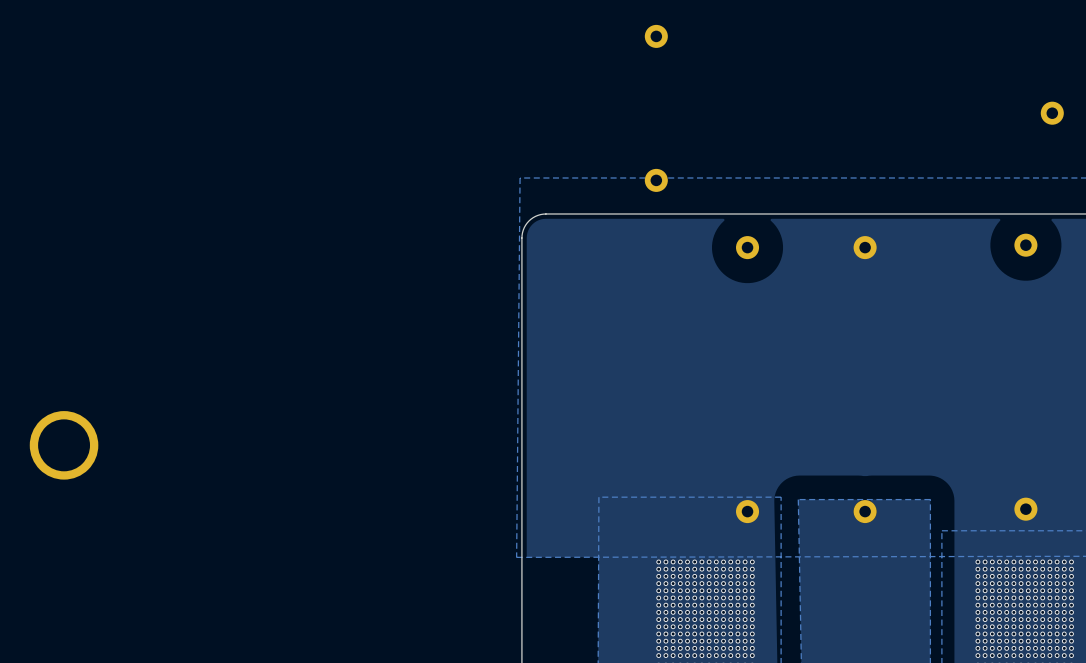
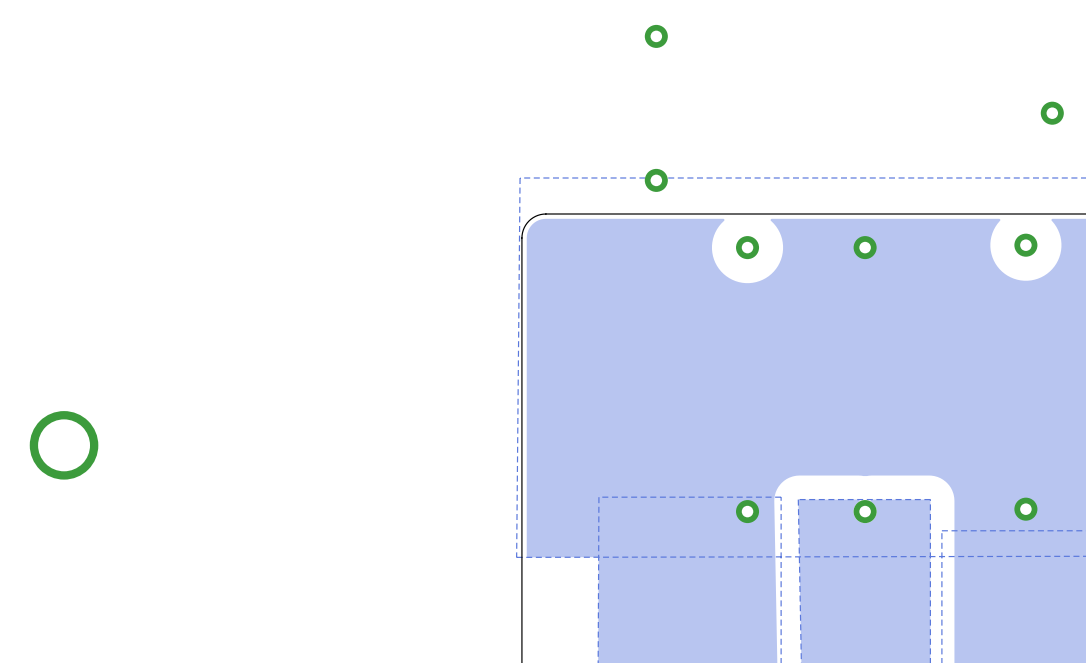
via: (658, 561) -> none
via: (665, 561) -> none
via: (673, 561) -> none
via: (680, 561) -> none
via: (687, 561) -> none
via: (694, 561) -> none
via: (701, 561) -> none
via: (709, 561) -> none
via: (716, 561) -> none
via: (723, 561) -> none
via: (730, 561) -> none
via: (737, 561) -> none
via: (745, 561) -> none
via: (752, 561) -> none
via: (977, 561) -> none
via: (985, 561) -> none
via: (992, 561) -> none
via: (999, 561) -> none
via: (1006, 561) -> none
via: (1013, 561) -> none
via: (1021, 561) -> none
via: (1028, 561) -> none
via: (1035, 561) -> none
via: (1042, 561) -> none
via: (1049, 561) -> none
via: (1057, 561) -> none
via: (1064, 561) -> none
via: (1071, 561) -> none
via: (658, 569) -> none
via: (665, 569) -> none
via: (673, 569) -> none
via: (680, 569) -> none
via: (687, 569) -> none
via: (694, 569) -> none
via: (701, 569) -> none
via: (709, 569) -> none
via: (716, 569) -> none
via: (723, 569) -> none
via: (730, 569) -> none
via: (737, 569) -> none
via: (745, 569) -> none
via: (752, 569) -> none
via: (977, 569) -> none
via: (985, 569) -> none
via: (992, 569) -> none
via: (999, 569) -> none
via: (1006, 569) -> none
via: (1013, 569) -> none
via: (1021, 569) -> none
via: (1028, 569) -> none
via: (1035, 569) -> none
via: (1042, 569) -> none
via: (1049, 569) -> none
via: (1057, 569) -> none
via: (1064, 569) -> none
via: (1071, 569) -> none
via: (658, 576) -> none
via: (665, 576) -> none
via: (673, 576) -> none
via: (680, 576) -> none
via: (687, 576) -> none
via: (694, 576) -> none
via: (701, 576) -> none
via: (709, 576) -> none
via: (716, 576) -> none
via: (723, 576) -> none
via: (730, 576) -> none
via: (737, 576) -> none
via: (745, 576) -> none
via: (752, 576) -> none
via: (977, 576) -> none
via: (985, 576) -> none
via: (992, 576) -> none
via: (999, 576) -> none
via: (1006, 576) -> none
via: (1013, 576) -> none
via: (1021, 576) -> none
via: (1028, 576) -> none
via: (1035, 576) -> none
via: (1042, 576) -> none
via: (1049, 576) -> none
via: (1057, 576) -> none
via: (1064, 576) -> none
via: (1071, 576) -> none
via: (658, 583) -> none
via: (665, 583) -> none
via: (673, 583) -> none
via: (680, 583) -> none
via: (687, 583) -> none
via: (694, 583) -> none
via: (701, 583) -> none
via: (709, 583) -> none
via: (716, 583) -> none
via: (723, 583) -> none
via: (730, 583) -> none
via: (737, 583) -> none
via: (745, 583) -> none
via: (752, 583) -> none
via: (977, 583) -> none
via: (985, 583) -> none
via: (992, 583) -> none
via: (999, 583) -> none
via: (1006, 583) -> none
via: (1013, 583) -> none
via: (1021, 583) -> none
via: (1028, 583) -> none
via: (1035, 583) -> none
via: (1042, 583) -> none
via: (1049, 583) -> none
via: (1057, 583) -> none
via: (1064, 583) -> none
via: (1071, 583) -> none
via: (658, 590) -> none
via: (665, 590) -> none
via: (673, 590) -> none
via: (680, 590) -> none
via: (687, 590) -> none
via: (694, 590) -> none
via: (701, 590) -> none
via: (709, 590) -> none
via: (716, 590) -> none
via: (723, 590) -> none
via: (730, 590) -> none
via: (737, 590) -> none
via: (745, 590) -> none
via: (752, 590) -> none
via: (977, 590) -> none
via: (985, 590) -> none
via: (992, 590) -> none
via: (999, 590) -> none
via: (1006, 590) -> none
via: (1013, 590) -> none
via: (1021, 590) -> none
via: (1028, 590) -> none
via: (1035, 590) -> none
via: (1042, 590) -> none
via: (1049, 590) -> none
via: (1057, 590) -> none
via: (1064, 590) -> none
via: (1071, 590) -> none
via: (658, 597) -> none
via: (665, 597) -> none
via: (673, 597) -> none
via: (680, 597) -> none
via: (687, 597) -> none
via: (694, 597) -> none
via: (701, 597) -> none
via: (709, 597) -> none
via: (716, 597) -> none
via: (723, 597) -> none
via: (730, 597) -> none
via: (737, 597) -> none
via: (745, 597) -> none
via: (752, 597) -> none
via: (977, 597) -> none
via: (985, 597) -> none
via: (992, 597) -> none
via: (999, 597) -> none
via: (1006, 597) -> none
via: (1013, 597) -> none
via: (1021, 597) -> none
via: (1028, 597) -> none
via: (1035, 597) -> none
via: (1042, 597) -> none
via: (1049, 597) -> none
via: (1057, 597) -> none
via: (1064, 597) -> none
via: (1071, 597) -> none
via: (658, 605) -> none
via: (665, 605) -> none
via: (673, 605) -> none
via: (680, 605) -> none
via: (687, 605) -> none
via: (694, 605) -> none
via: (701, 605) -> none
via: (709, 605) -> none
via: (716, 605) -> none
via: (723, 605) -> none
via: (730, 605) -> none
via: (737, 605) -> none
via: (745, 605) -> none
via: (752, 605) -> none
via: (977, 605) -> none
via: (985, 605) -> none
via: (992, 605) -> none
via: (999, 605) -> none
via: (1006, 605) -> none
via: (1013, 605) -> none
via: (1021, 605) -> none
via: (1028, 605) -> none
via: (1035, 605) -> none
via: (1042, 605) -> none
via: (1049, 605) -> none
via: (1057, 605) -> none
via: (1064, 605) -> none
via: (1071, 605) -> none
via: (658, 612) -> none
via: (665, 612) -> none
via: (673, 612) -> none
via: (680, 612) -> none
via: (687, 612) -> none
via: (694, 612) -> none
via: (701, 612) -> none
via: (709, 612) -> none
via: (716, 612) -> none
via: (723, 612) -> none
via: (730, 612) -> none
via: (737, 612) -> none
via: (745, 612) -> none
via: (752, 612) -> none
via: (977, 612) -> none
via: (985, 612) -> none
via: (992, 612) -> none
via: (999, 612) -> none
via: (1006, 612) -> none
via: (1013, 612) -> none
via: (1021, 612) -> none
via: (1028, 612) -> none
via: (1035, 612) -> none
via: (1042, 612) -> none
via: (1049, 612) -> none
via: (1057, 612) -> none
via: (1064, 612) -> none
via: (1071, 612) -> none
via: (658, 619) -> none
via: (665, 619) -> none
via: (673, 619) -> none
via: (680, 619) -> none
via: (687, 619) -> none
via: (694, 619) -> none
via: (701, 619) -> none
via: (709, 619) -> none
via: (716, 619) -> none
via: (723, 619) -> none
via: (730, 619) -> none
via: (737, 619) -> none
via: (745, 619) -> none
via: (752, 619) -> none
via: (977, 619) -> none
via: (985, 619) -> none
via: (992, 619) -> none
via: (999, 619) -> none
via: (1006, 619) -> none
via: (1013, 619) -> none
via: (1021, 619) -> none
via: (1028, 619) -> none
via: (1035, 619) -> none
via: (1042, 619) -> none
via: (1049, 619) -> none
via: (1057, 619) -> none
via: (1064, 619) -> none
via: (1071, 619) -> none
via: (658, 626) -> none
via: (665, 626) -> none
via: (673, 626) -> none
via: (680, 626) -> none
via: (687, 626) -> none
via: (694, 626) -> none
via: (701, 626) -> none
via: (709, 626) -> none
via: (716, 626) -> none
via: (723, 626) -> none
via: (730, 626) -> none
via: (737, 626) -> none
via: (745, 626) -> none
via: (752, 626) -> none
via: (977, 626) -> none
via: (985, 626) -> none
via: (992, 626) -> none
via: (999, 626) -> none
via: (1006, 626) -> none
via: (1013, 626) -> none
via: (1021, 626) -> none
via: (1028, 626) -> none
via: (1035, 626) -> none
via: (1042, 626) -> none
via: (1049, 626) -> none
via: (1057, 626) -> none
via: (1064, 626) -> none
via: (1071, 626) -> none
via: (658, 633) -> none
via: (665, 633) -> none
via: (673, 633) -> none
via: (680, 633) -> none
via: (687, 633) -> none
via: (694, 633) -> none
via: (701, 633) -> none
via: (709, 633) -> none
via: (716, 633) -> none
via: (723, 633) -> none
via: (730, 633) -> none
via: (737, 633) -> none
via: (745, 633) -> none
via: (752, 633) -> none
via: (977, 633) -> none
via: (985, 633) -> none
via: (992, 633) -> none
via: (999, 633) -> none
via: (1006, 633) -> none
via: (1013, 633) -> none
via: (1021, 633) -> none
via: (1028, 633) -> none
via: (1035, 633) -> none
via: (1042, 633) -> none
via: (1049, 633) -> none
via: (1057, 633) -> none
via: (1064, 633) -> none
via: (1071, 633) -> none
via: (658, 641) -> none
via: (665, 641) -> none
via: (673, 641) -> none
via: (680, 641) -> none
via: (687, 641) -> none
via: (694, 641) -> none
via: (701, 641) -> none
via: (709, 641) -> none
via: (716, 641) -> none
via: (723, 641) -> none
via: (730, 641) -> none
via: (737, 641) -> none
via: (745, 641) -> none
via: (752, 641) -> none
via: (977, 641) -> none
via: (985, 641) -> none
via: (992, 641) -> none
via: (999, 641) -> none
via: (1006, 641) -> none
via: (1013, 641) -> none
via: (1021, 641) -> none
via: (1028, 641) -> none
via: (1035, 641) -> none
via: (1042, 641) -> none
via: (1049, 641) -> none
via: (1057, 641) -> none
via: (1064, 641) -> none
via: (1071, 641) -> none
via: (658, 648) -> none
via: (665, 648) -> none
via: (673, 648) -> none
via: (680, 648) -> none
via: (687, 648) -> none
via: (694, 648) -> none
via: (701, 648) -> none
via: (709, 648) -> none
via: (716, 648) -> none
via: (723, 648) -> none
via: (730, 648) -> none
via: (737, 648) -> none
via: (745, 648) -> none
via: (752, 648) -> none
via: (977, 648) -> none
via: (985, 648) -> none
via: (992, 648) -> none
via: (999, 648) -> none
via: (1006, 648) -> none
via: (1013, 648) -> none
via: (1021, 648) -> none
via: (1028, 648) -> none
via: (1035, 648) -> none
via: (1042, 648) -> none
via: (1049, 648) -> none
via: (1057, 648) -> none
via: (1064, 648) -> none
via: (1071, 648) -> none
via: (658, 655) -> none
via: (665, 655) -> none
via: (673, 655) -> none
via: (680, 655) -> none
via: (687, 655) -> none
via: (694, 655) -> none
via: (701, 655) -> none
via: (709, 655) -> none
via: (716, 655) -> none
via: (723, 655) -> none
via: (730, 655) -> none
via: (737, 655) -> none
via: (745, 655) -> none
via: (752, 655) -> none
via: (977, 655) -> none
via: (985, 655) -> none
via: (992, 655) -> none
via: (999, 655) -> none
via: (1006, 655) -> none
via: (1013, 655) -> none
via: (1021, 655) -> none
via: (1028, 655) -> none
via: (1035, 655) -> none
via: (1042, 655) -> none
via: (1049, 655) -> none
via: (1057, 655) -> none
via: (1064, 655) -> none
via: (1071, 655) -> none

